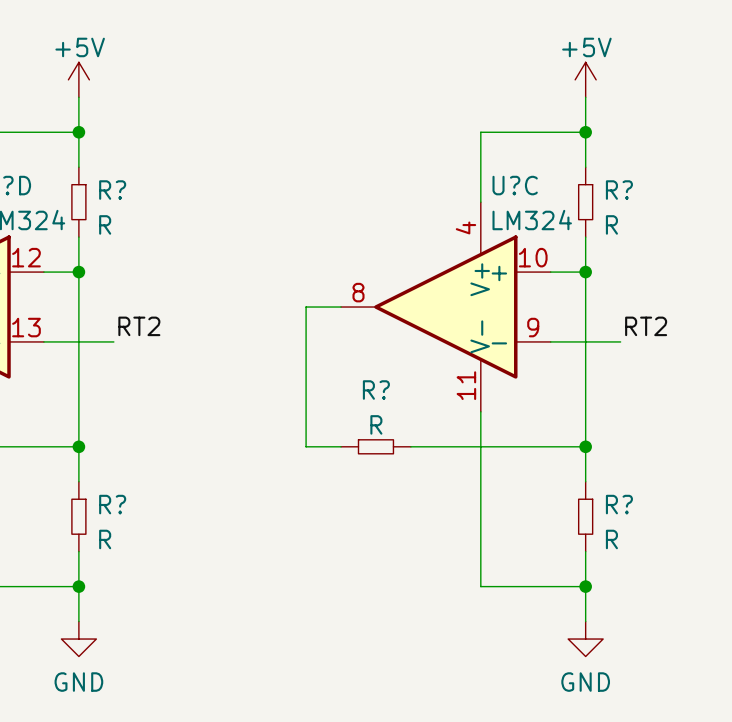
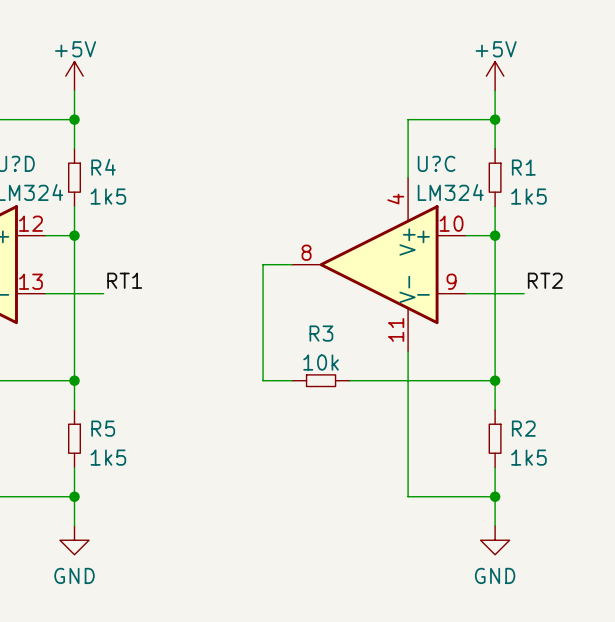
R? name: R? (112, 190) -> R4 (103, 167)
R? name: R? (619, 190) -> R1 (523, 167)
R? value: R (105, 224) -> 1k5 (108, 196)
R? value: R (611, 224) -> 1k5 (528, 196)
label: RT2 (139, 326) -> RT1 (124, 280)
R? name: R? (376, 390) -> R3 (321, 333)
R? value: R (376, 424) -> 10k (321, 362)
R? name: R? (112, 504) -> R5 (103, 428)
R? name: R? (619, 504) -> R2 (523, 428)
R? value: R (105, 539) -> 1k5 (108, 457)
R? value: R (611, 539) -> 1k5 (528, 457)

